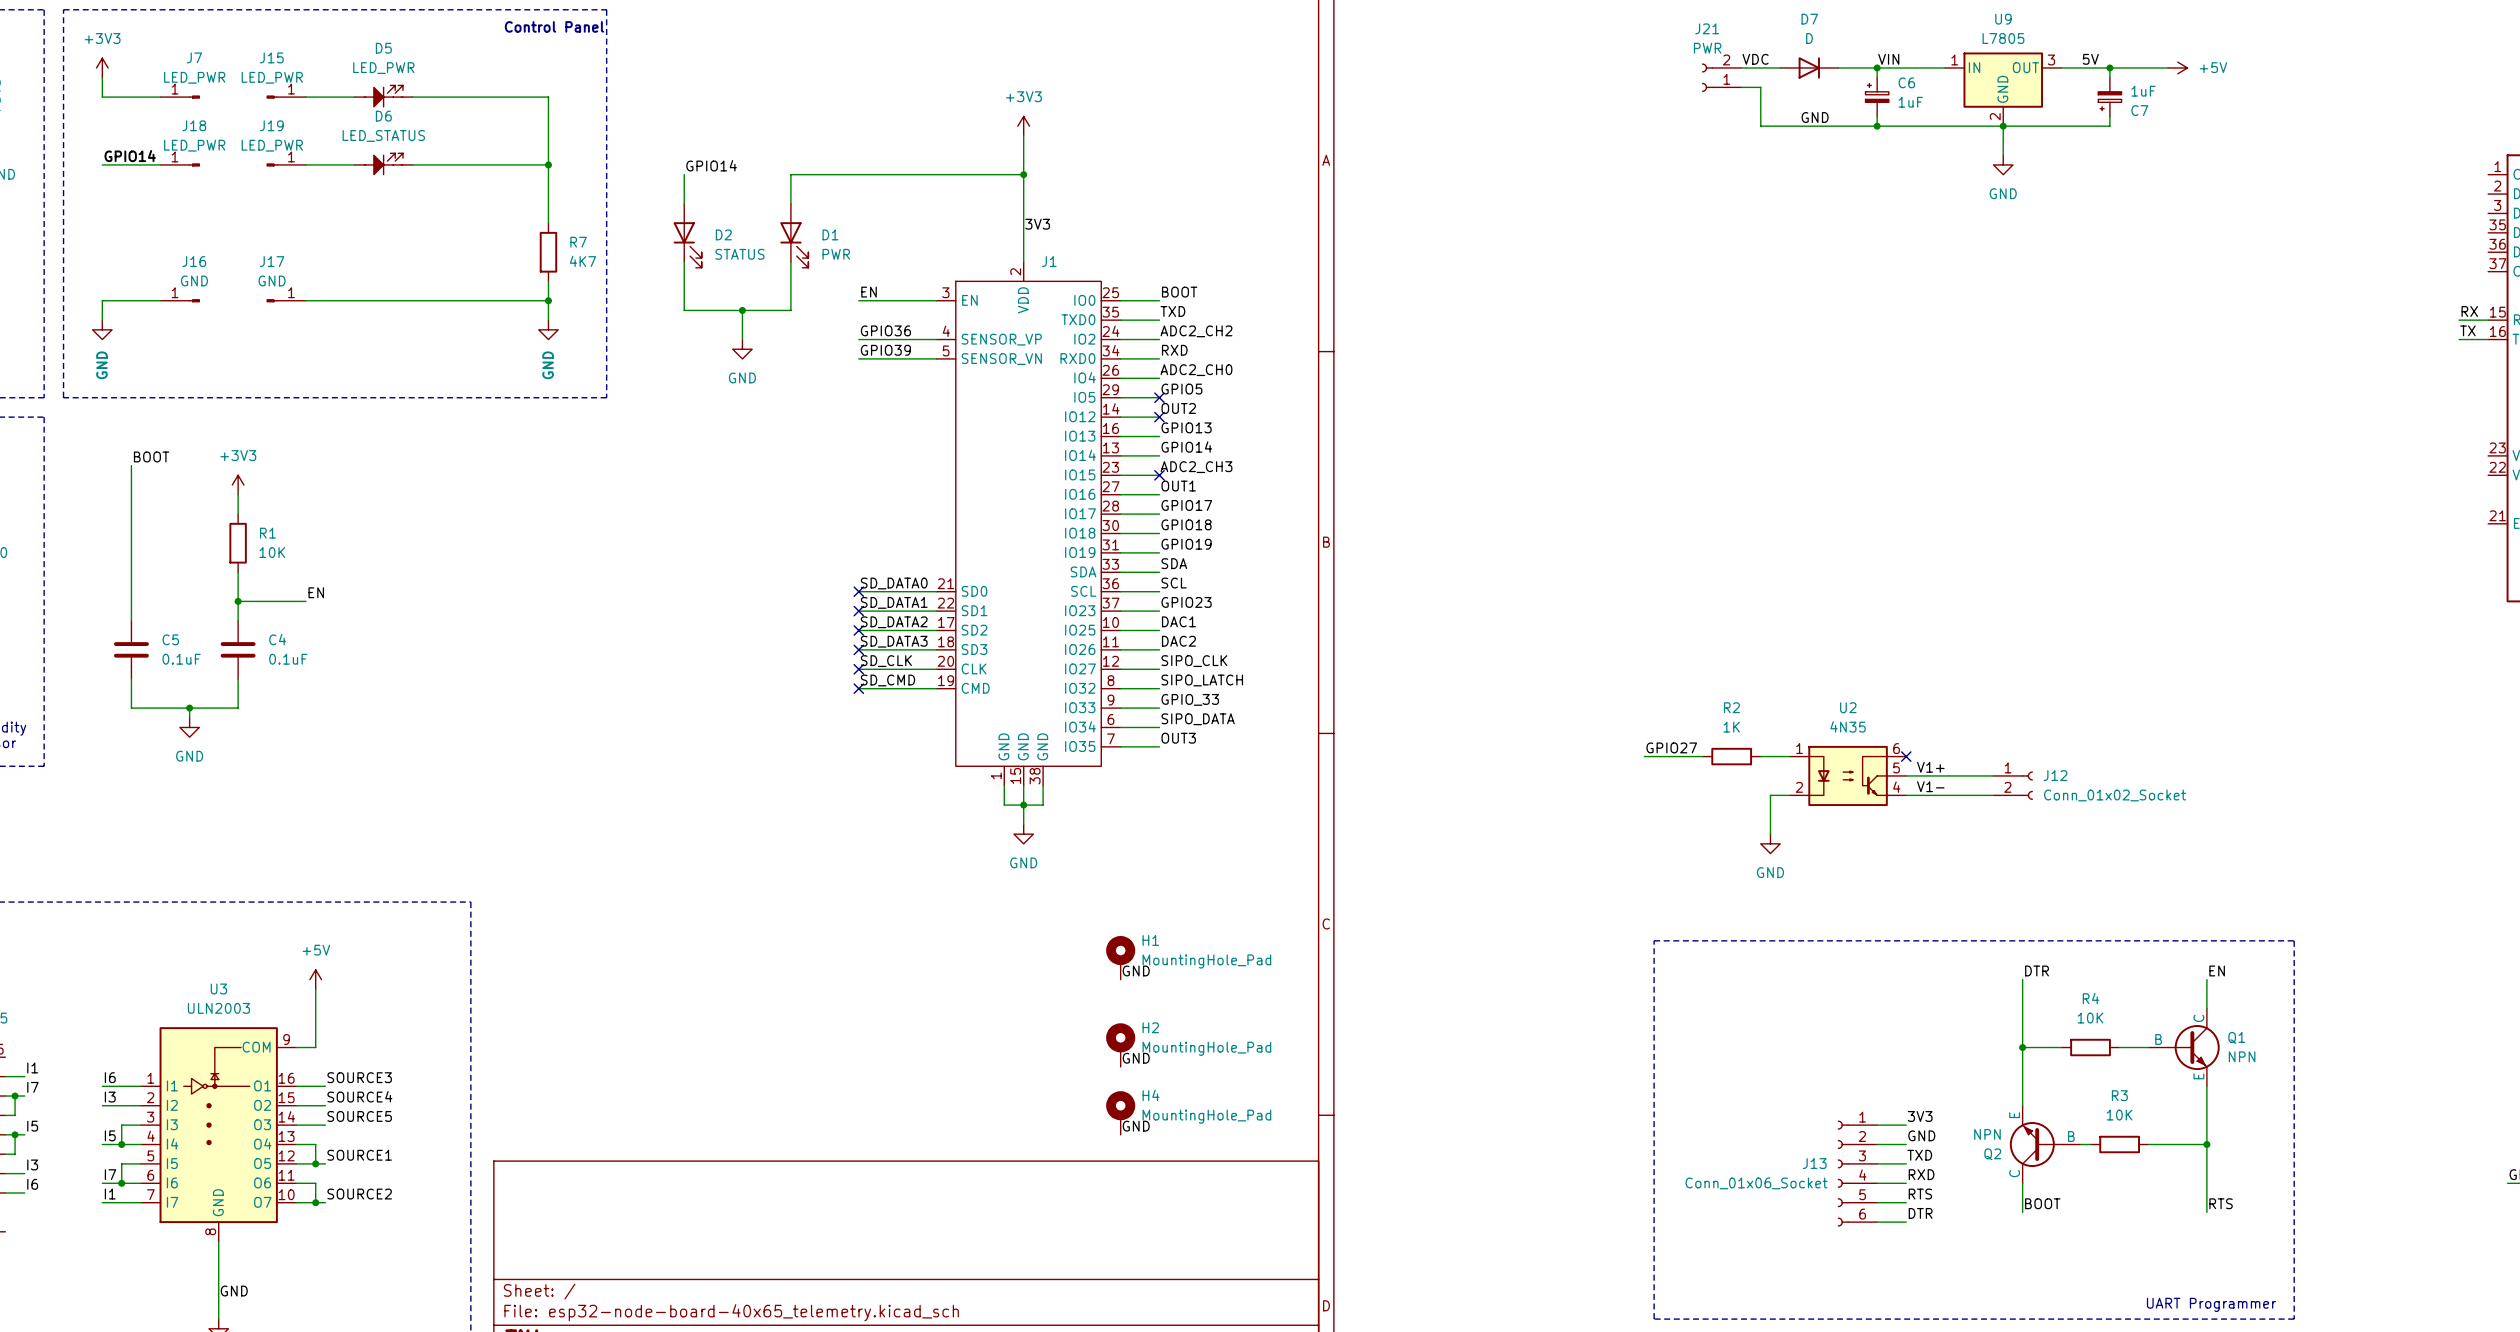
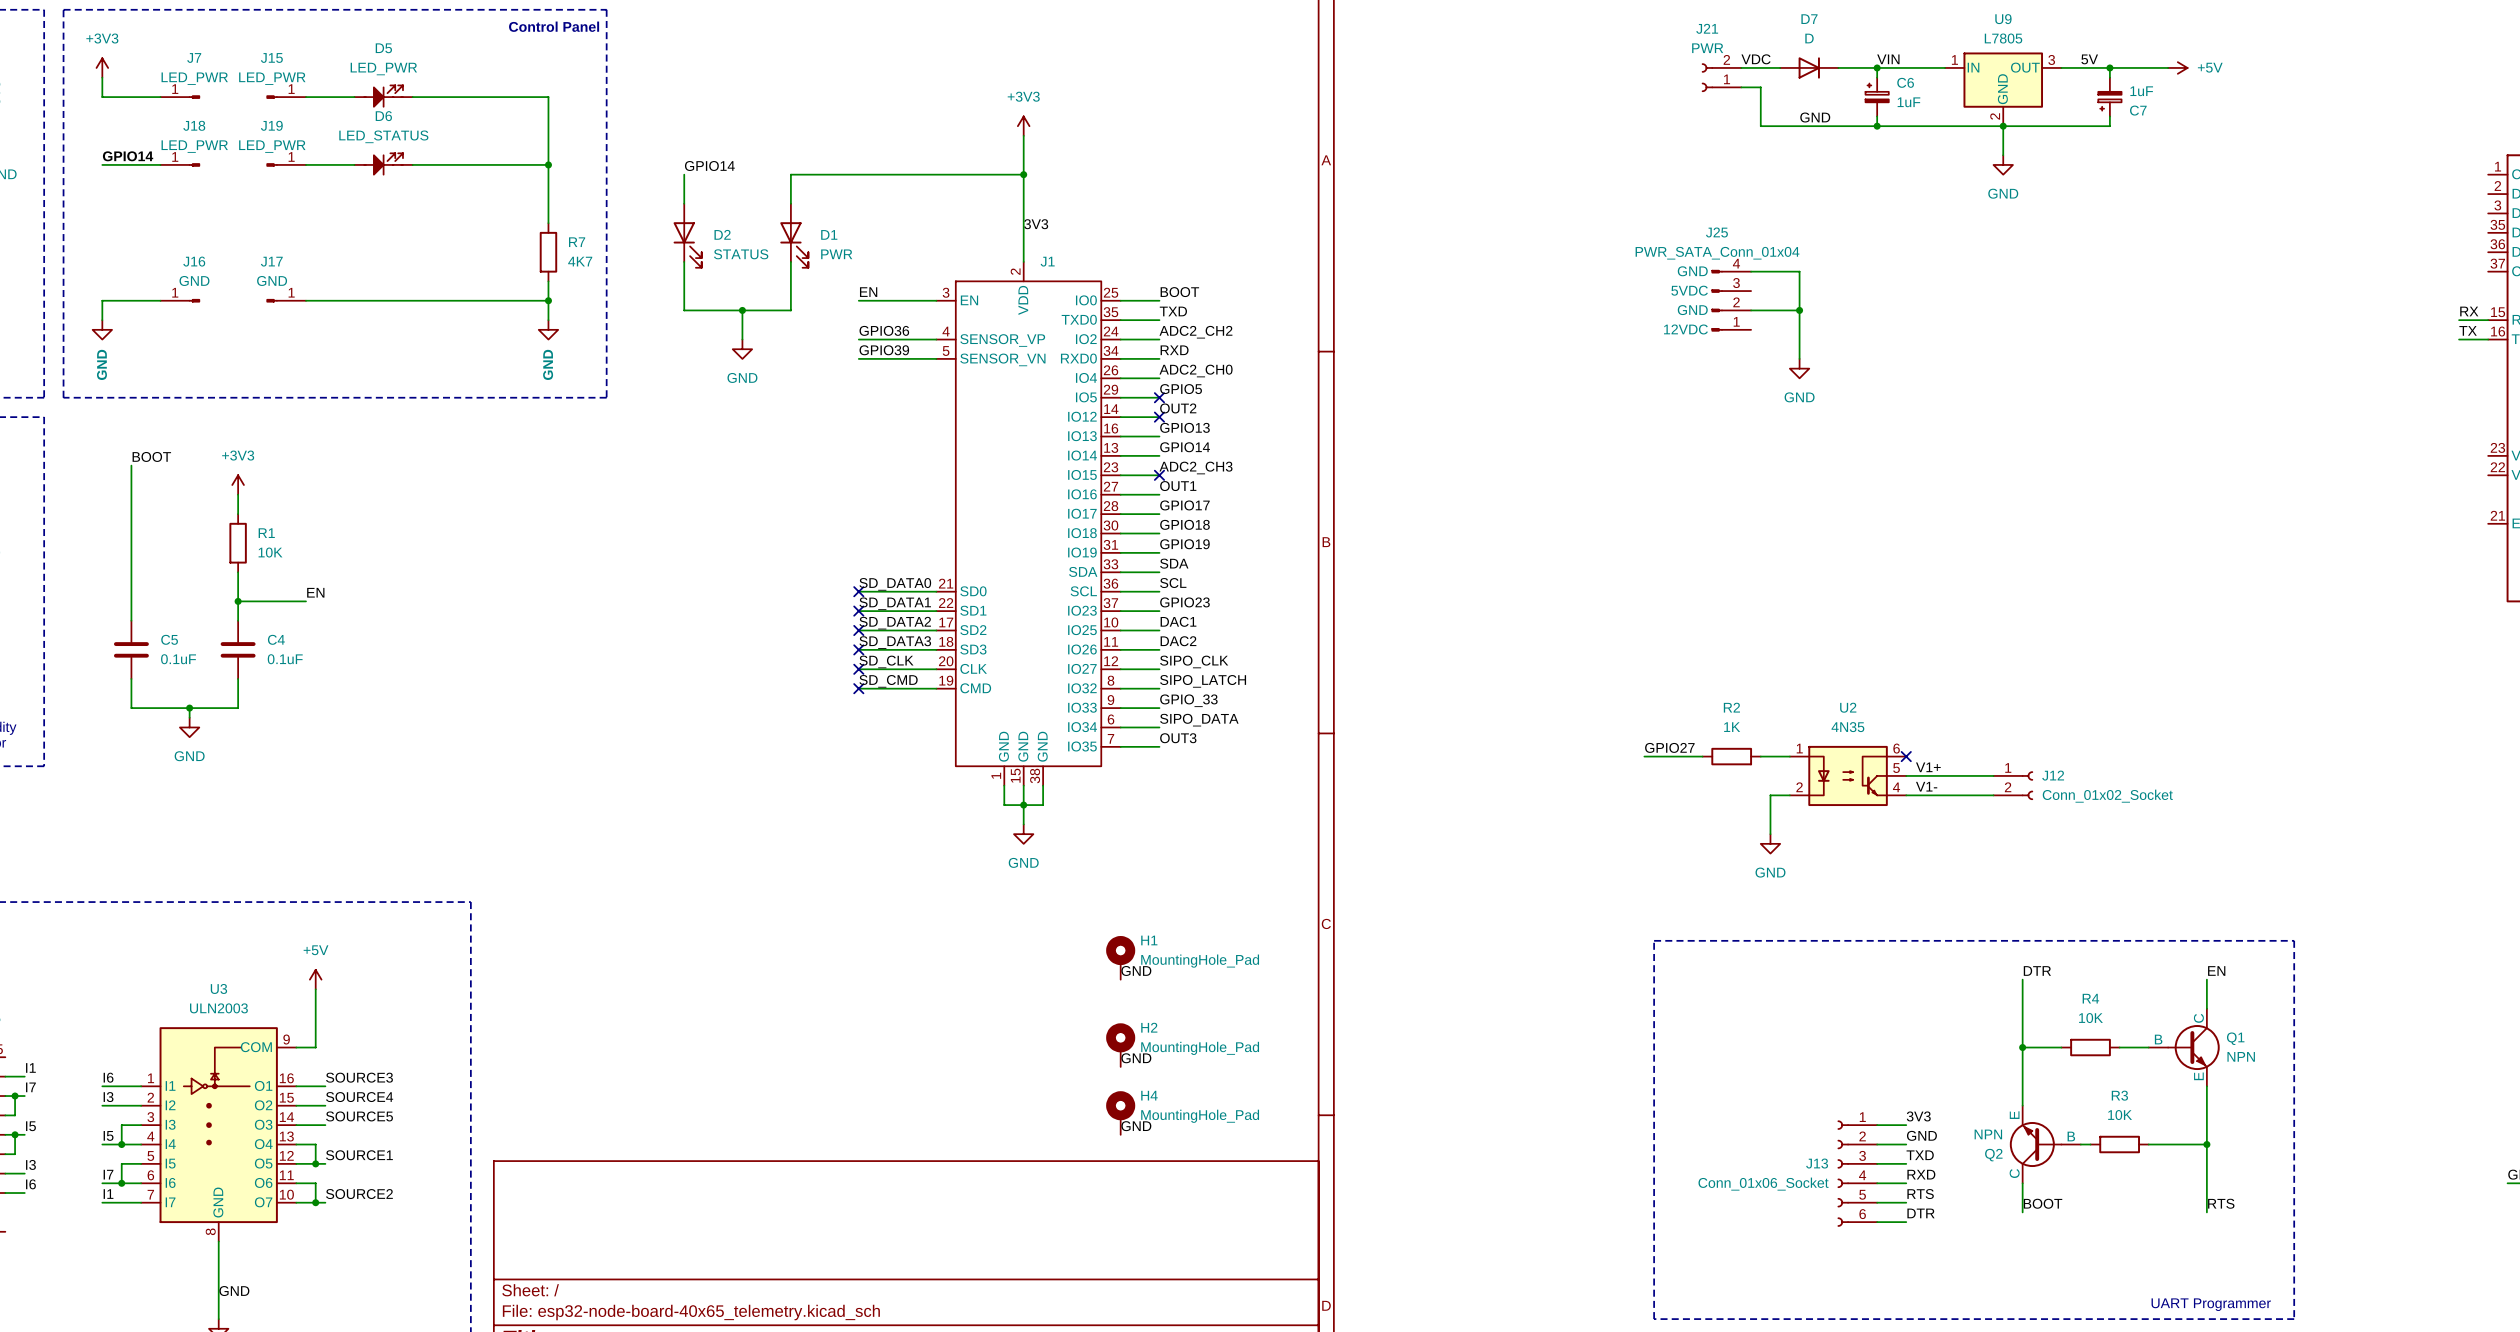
wire: none -> (1751, 271) (1799, 271) (1799, 358)
J25: none -> PWR_SATA_Conn_01x04 (1731, 300)
wire: none -> (1751, 310) (1799, 310)
junction: none -> (1799, 310)
power symbol: none -> GND (1799, 368)

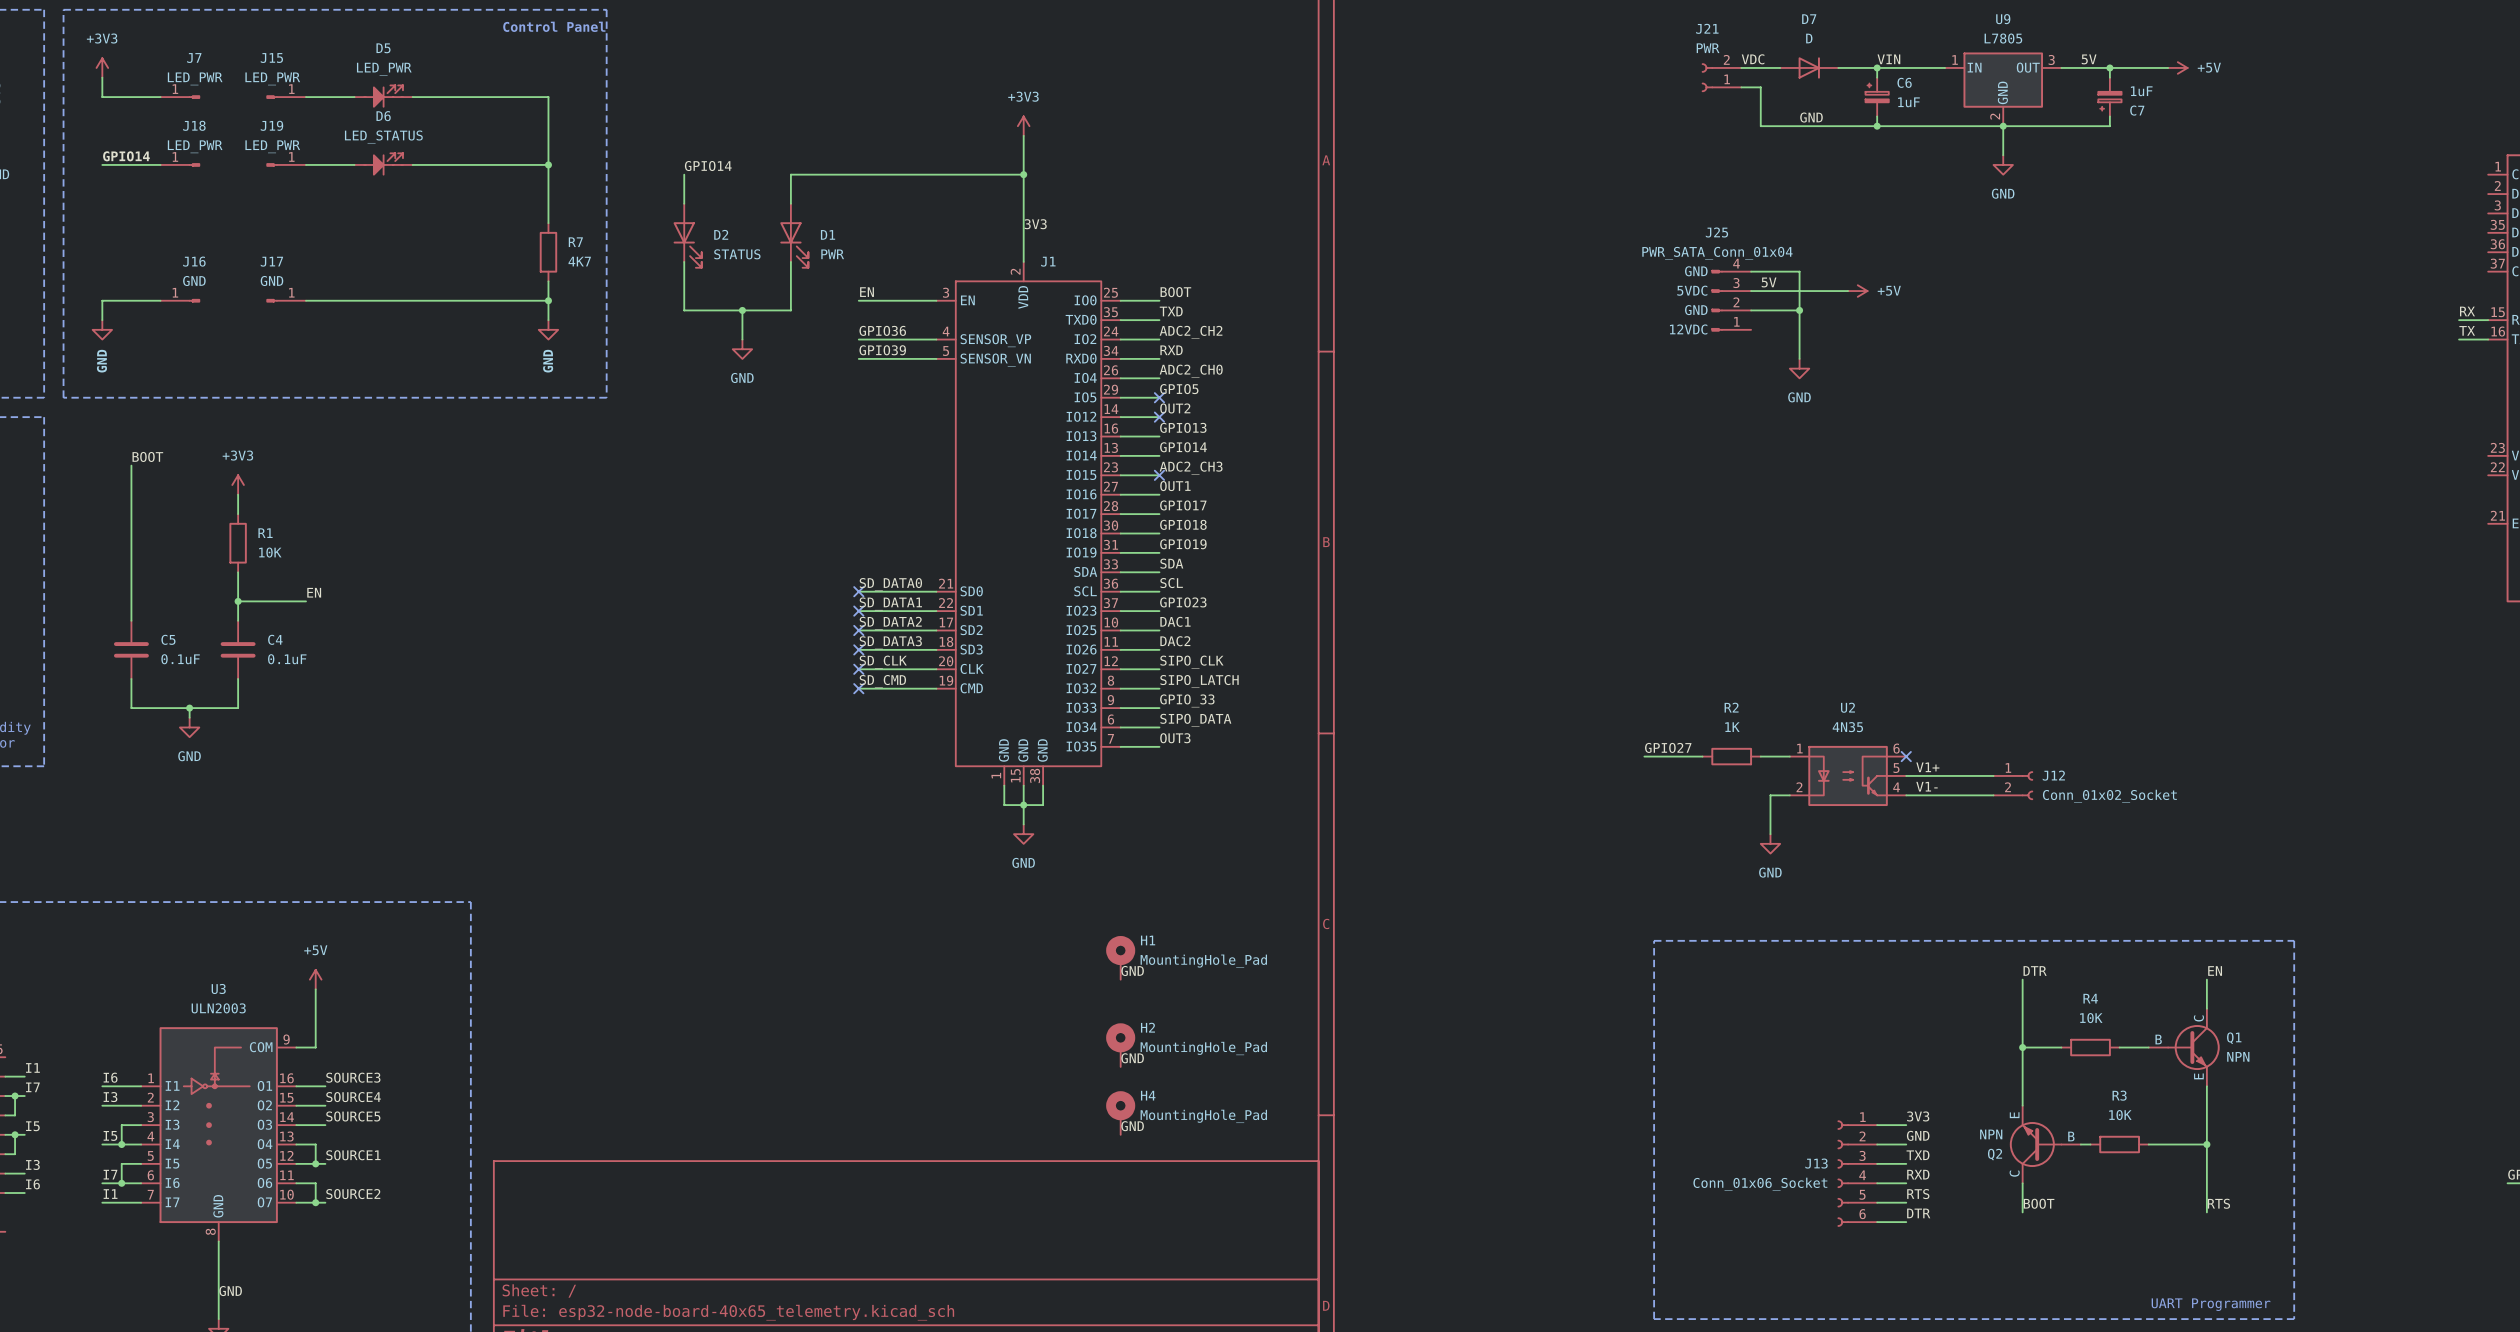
label: none -> 5V (1769, 282)
wire: none -> (1751, 291) (1848, 291)
power symbol: none -> +5V (1857, 291)

